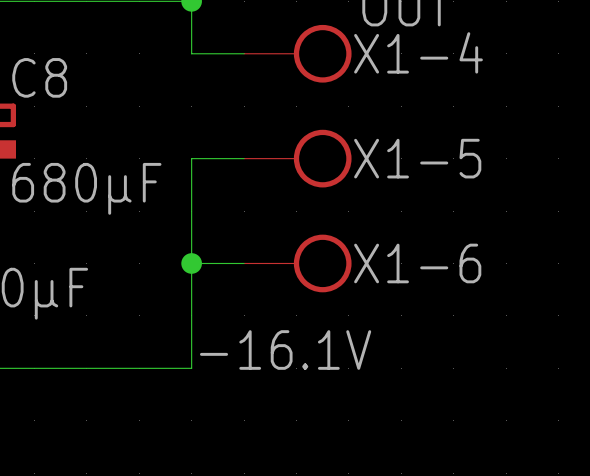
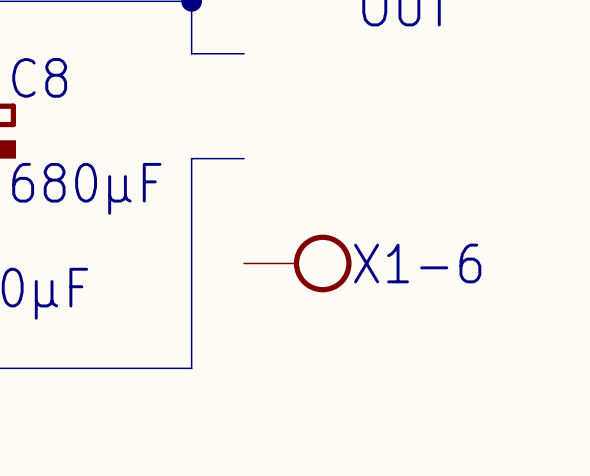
X1-4: (297, 53) -> none
X1-5: (297, 158) -> none
wire: (191, 263) (244, 263) -> none
junction: (191, 263) -> none
label: -16.1V (285, 349) -> none

